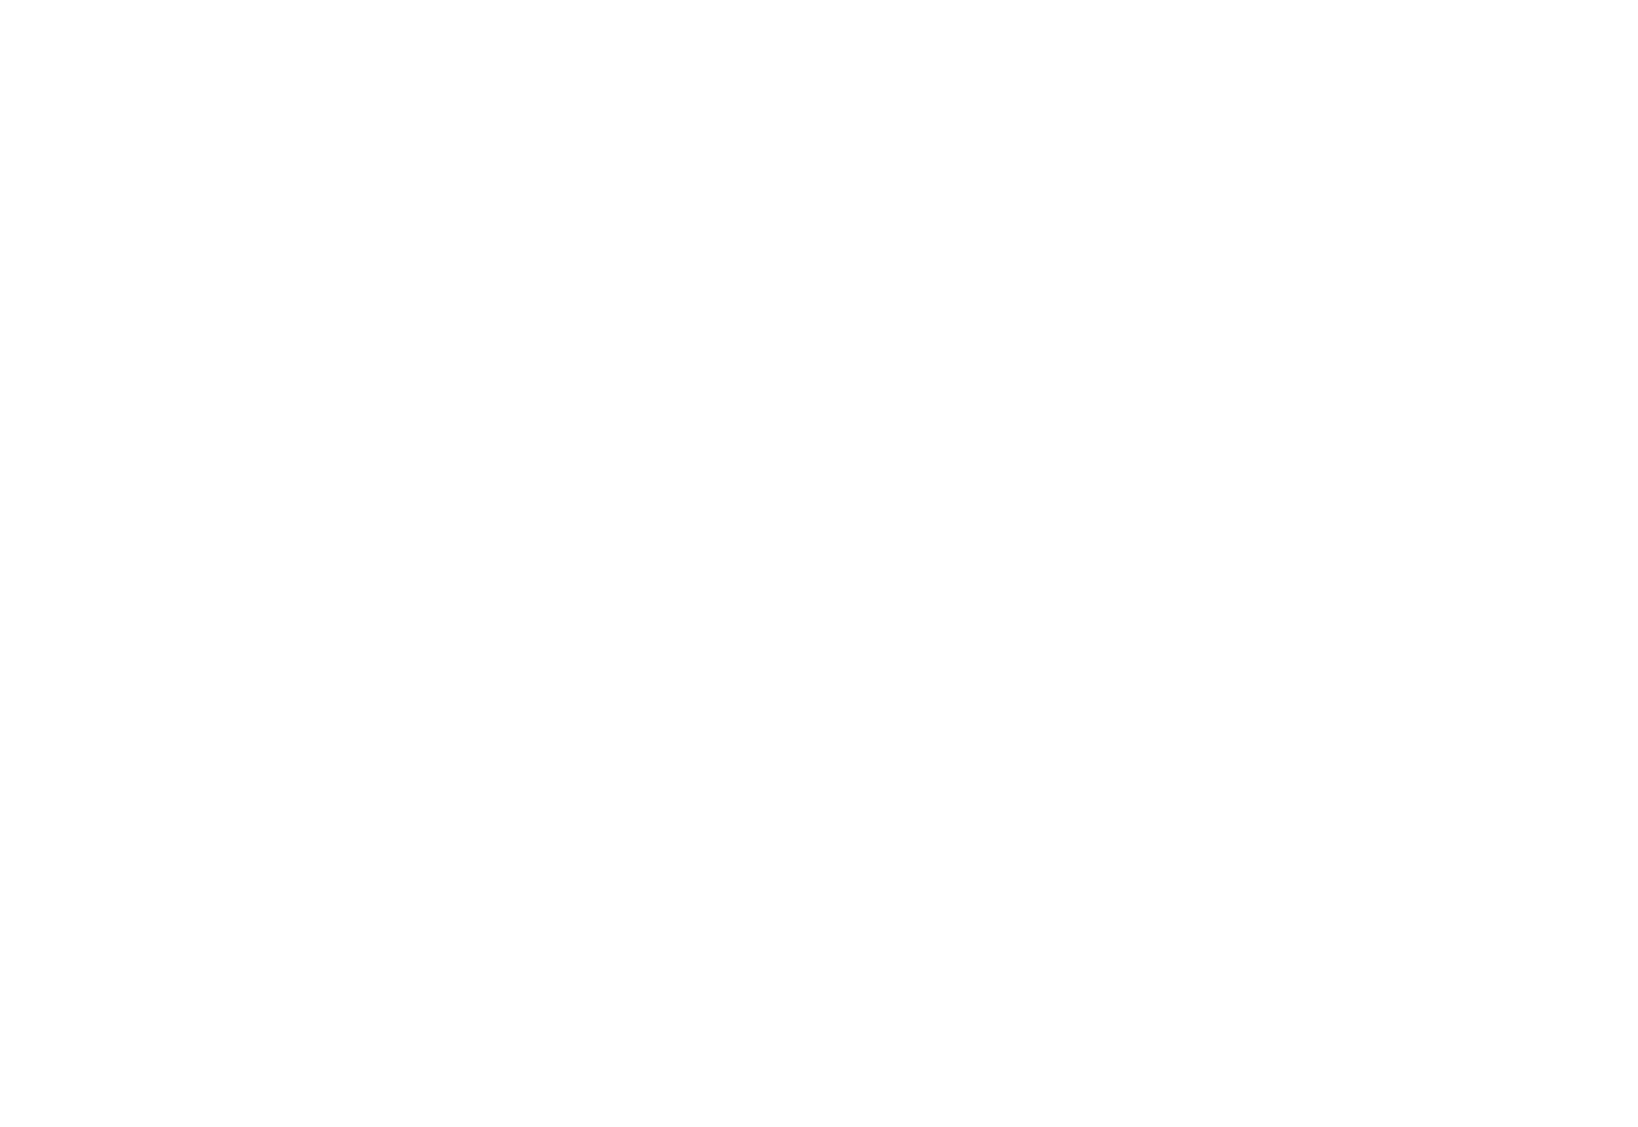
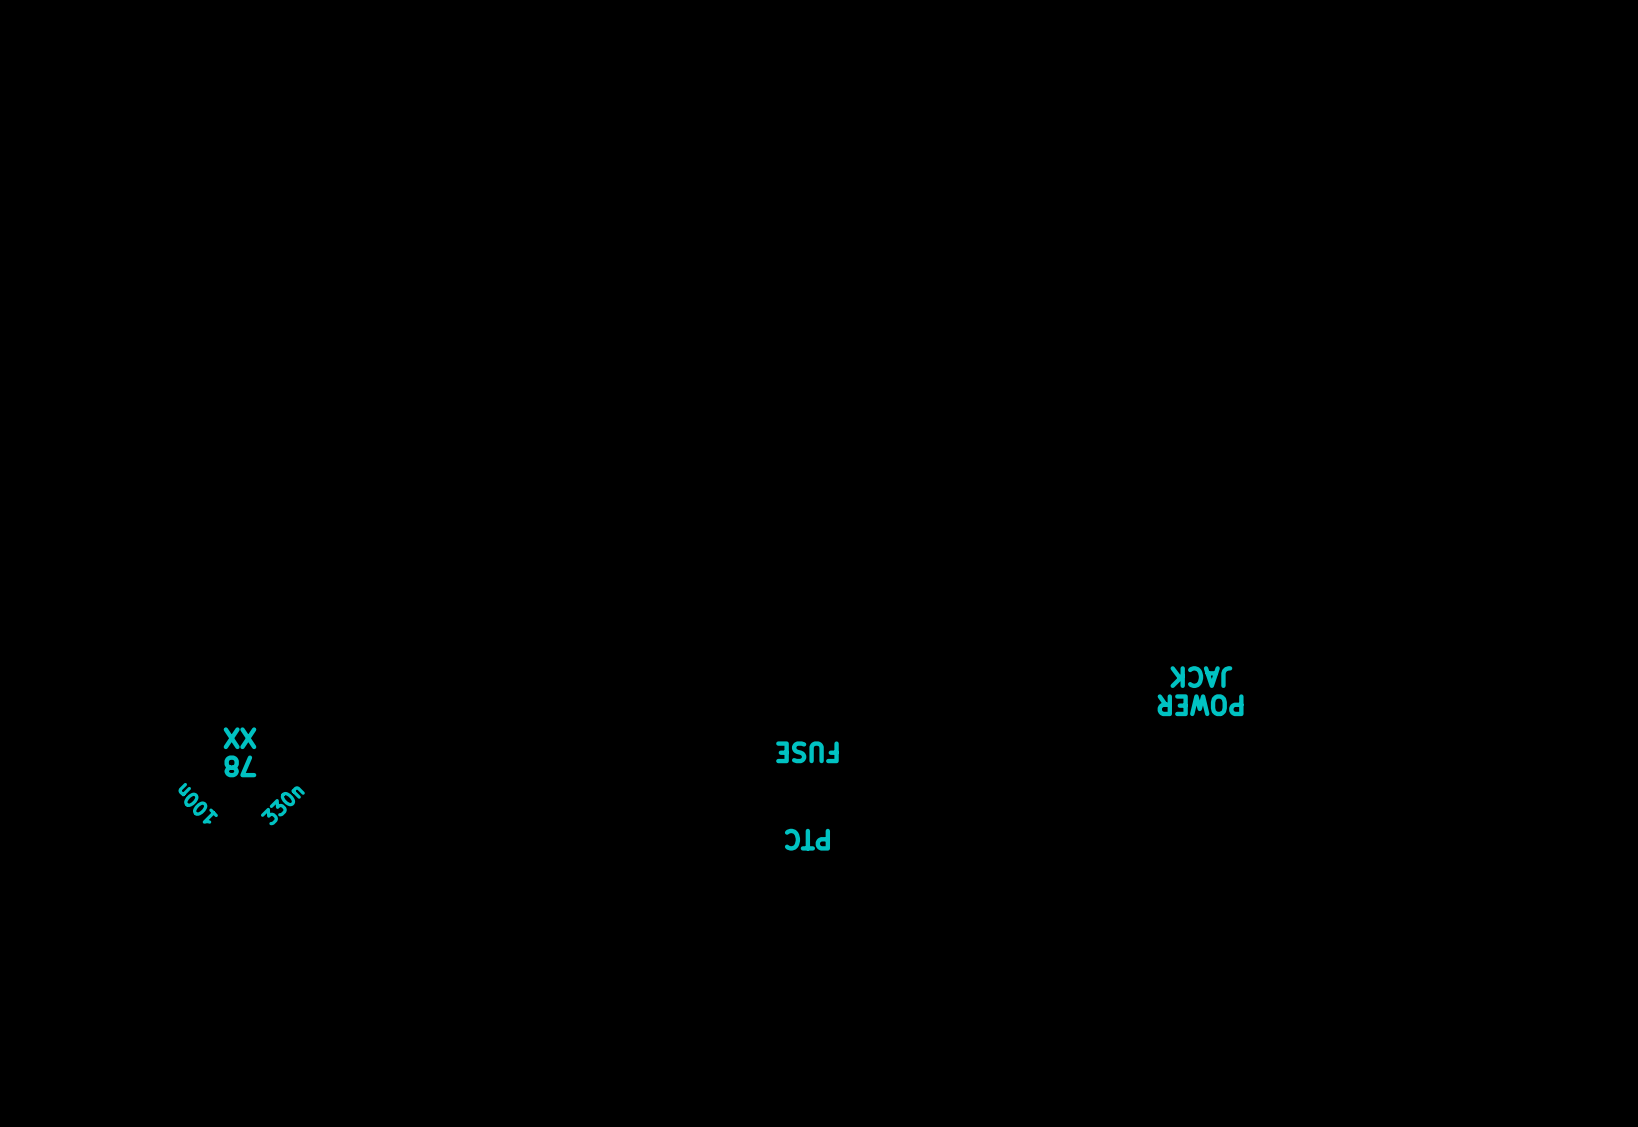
text: none -> JACK (1201, 677)
text: none -> POWER (1200, 705)
text: none -> XX (239, 738)
text: none -> FUSE (807, 752)
text: none -> 78 (240, 766)
text: none -> 100n (198, 803)
text: none -> 330n (282, 805)
text: none -> PTC (807, 839)

